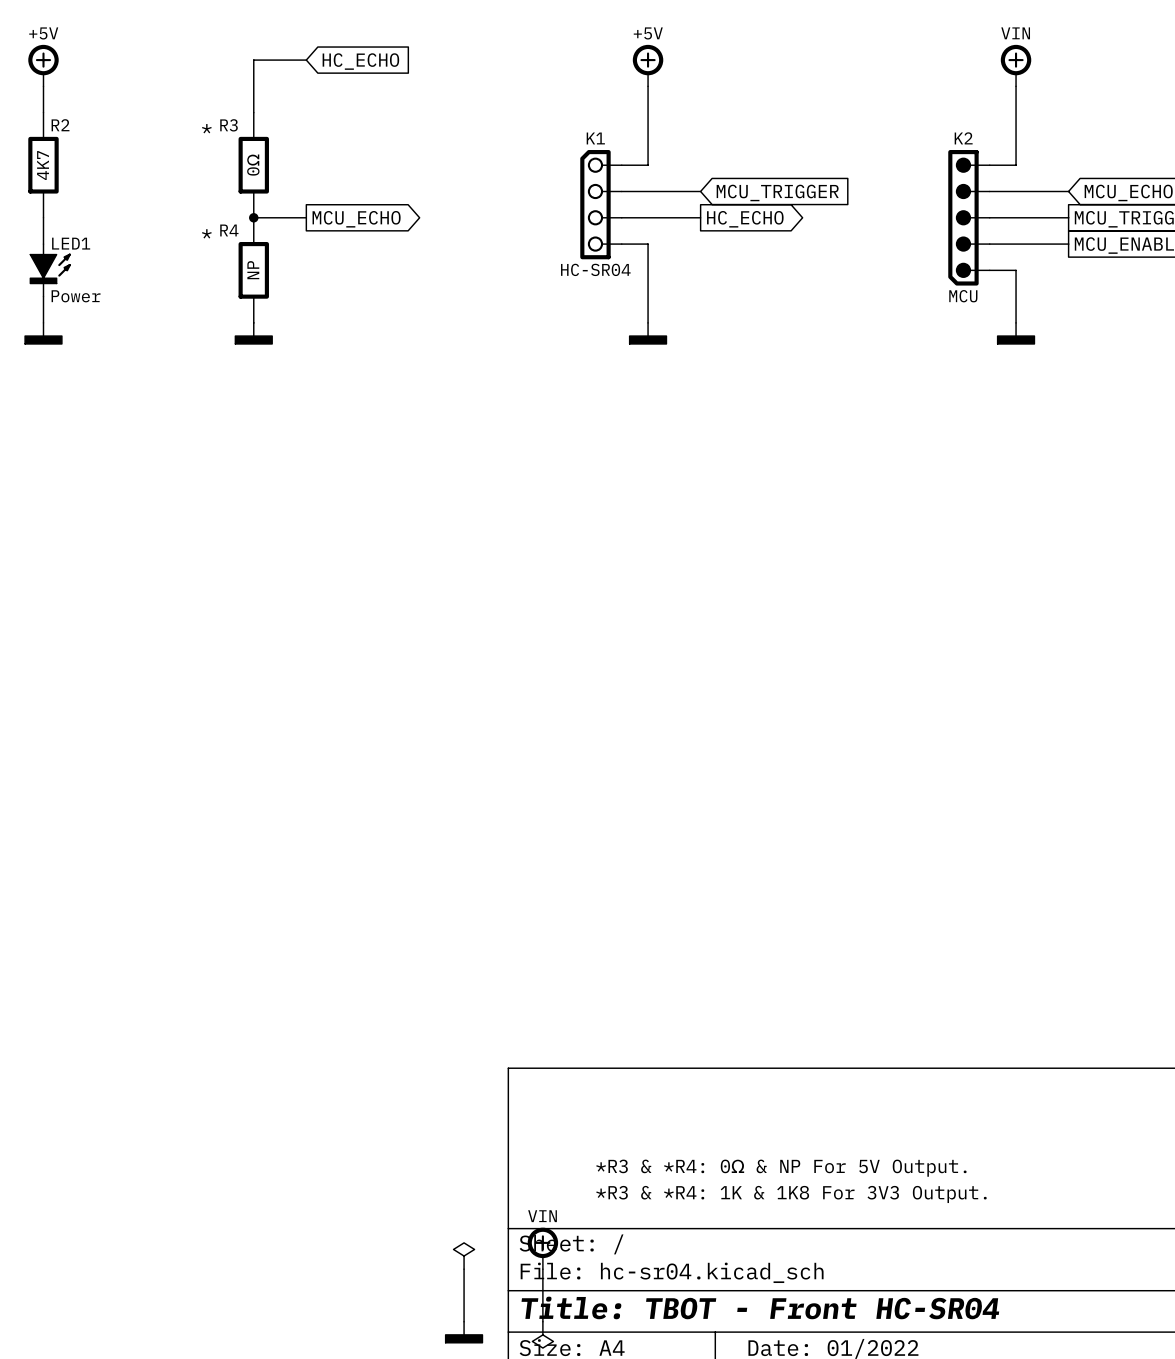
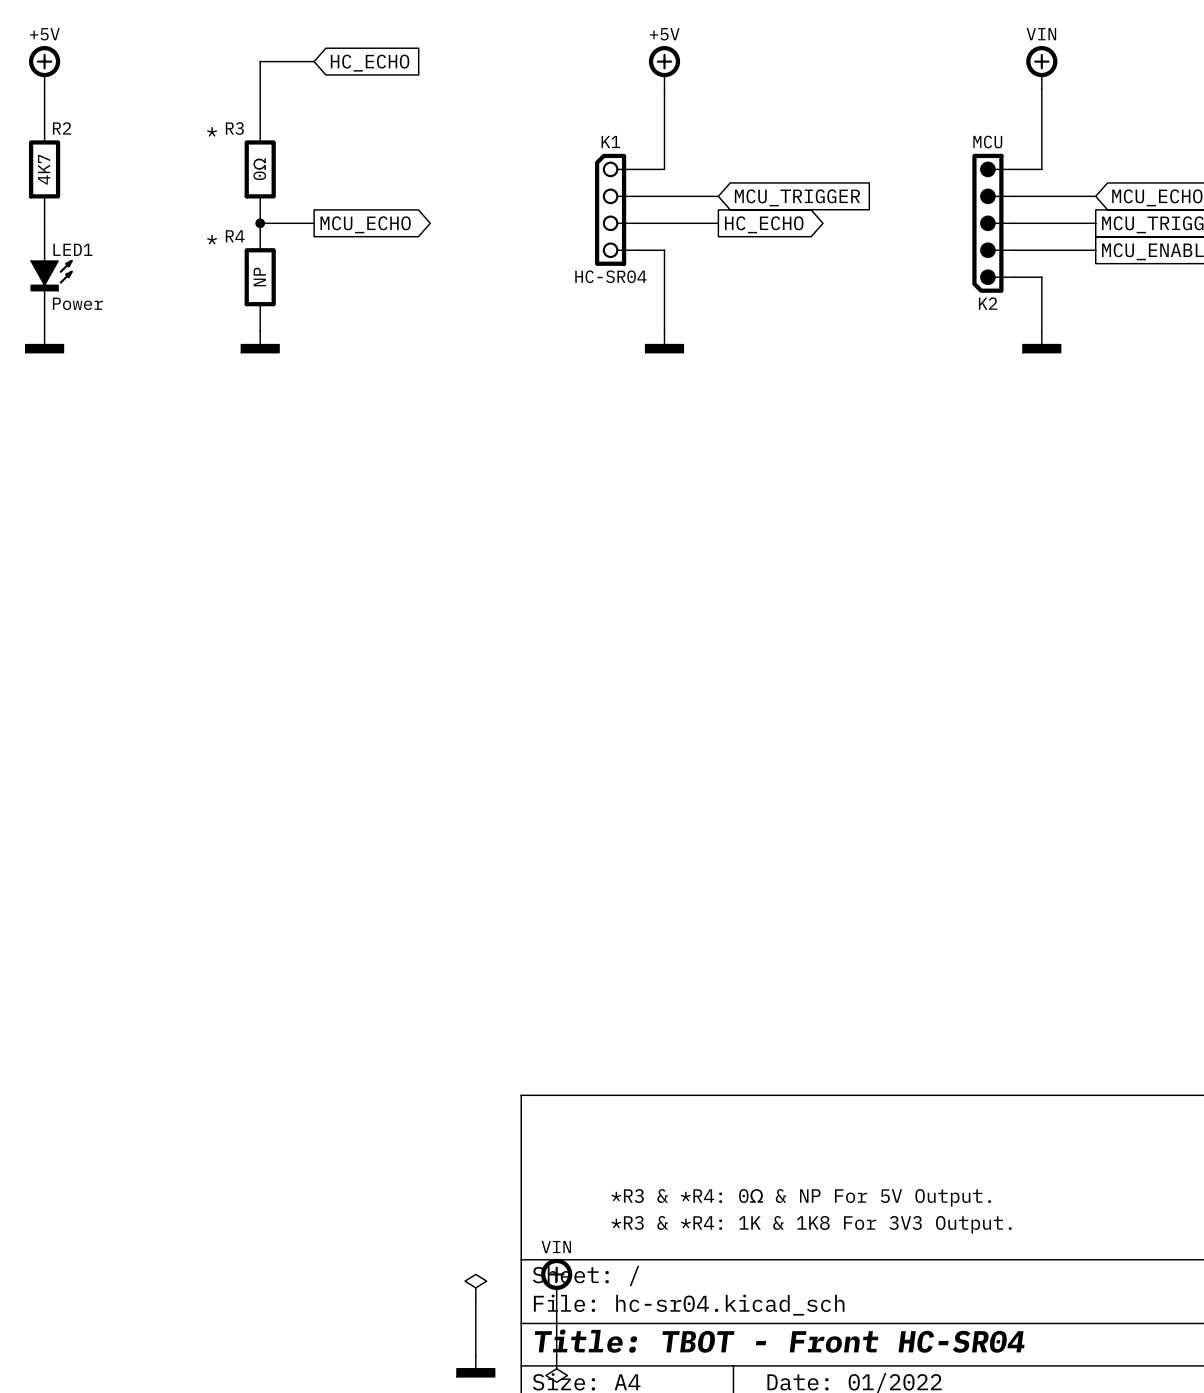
K2 name position: K2 (963, 138) -> K2 (988, 303)
K2 value position: MCU (963, 296) -> MCU (987, 142)

